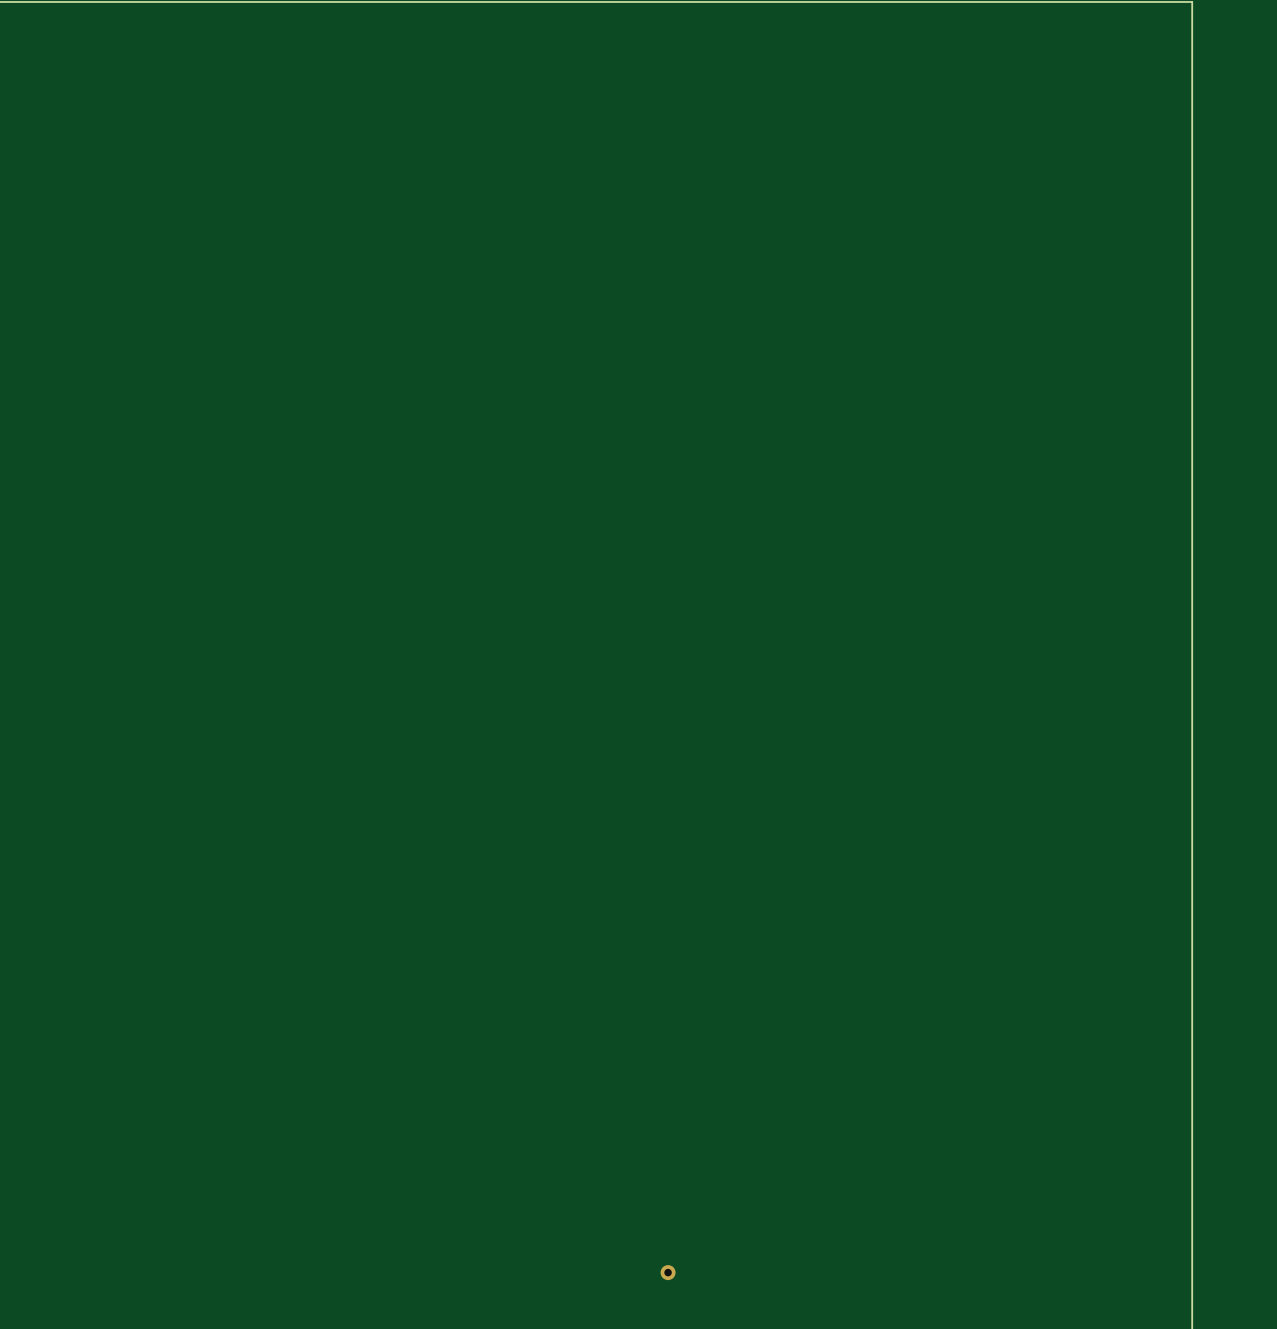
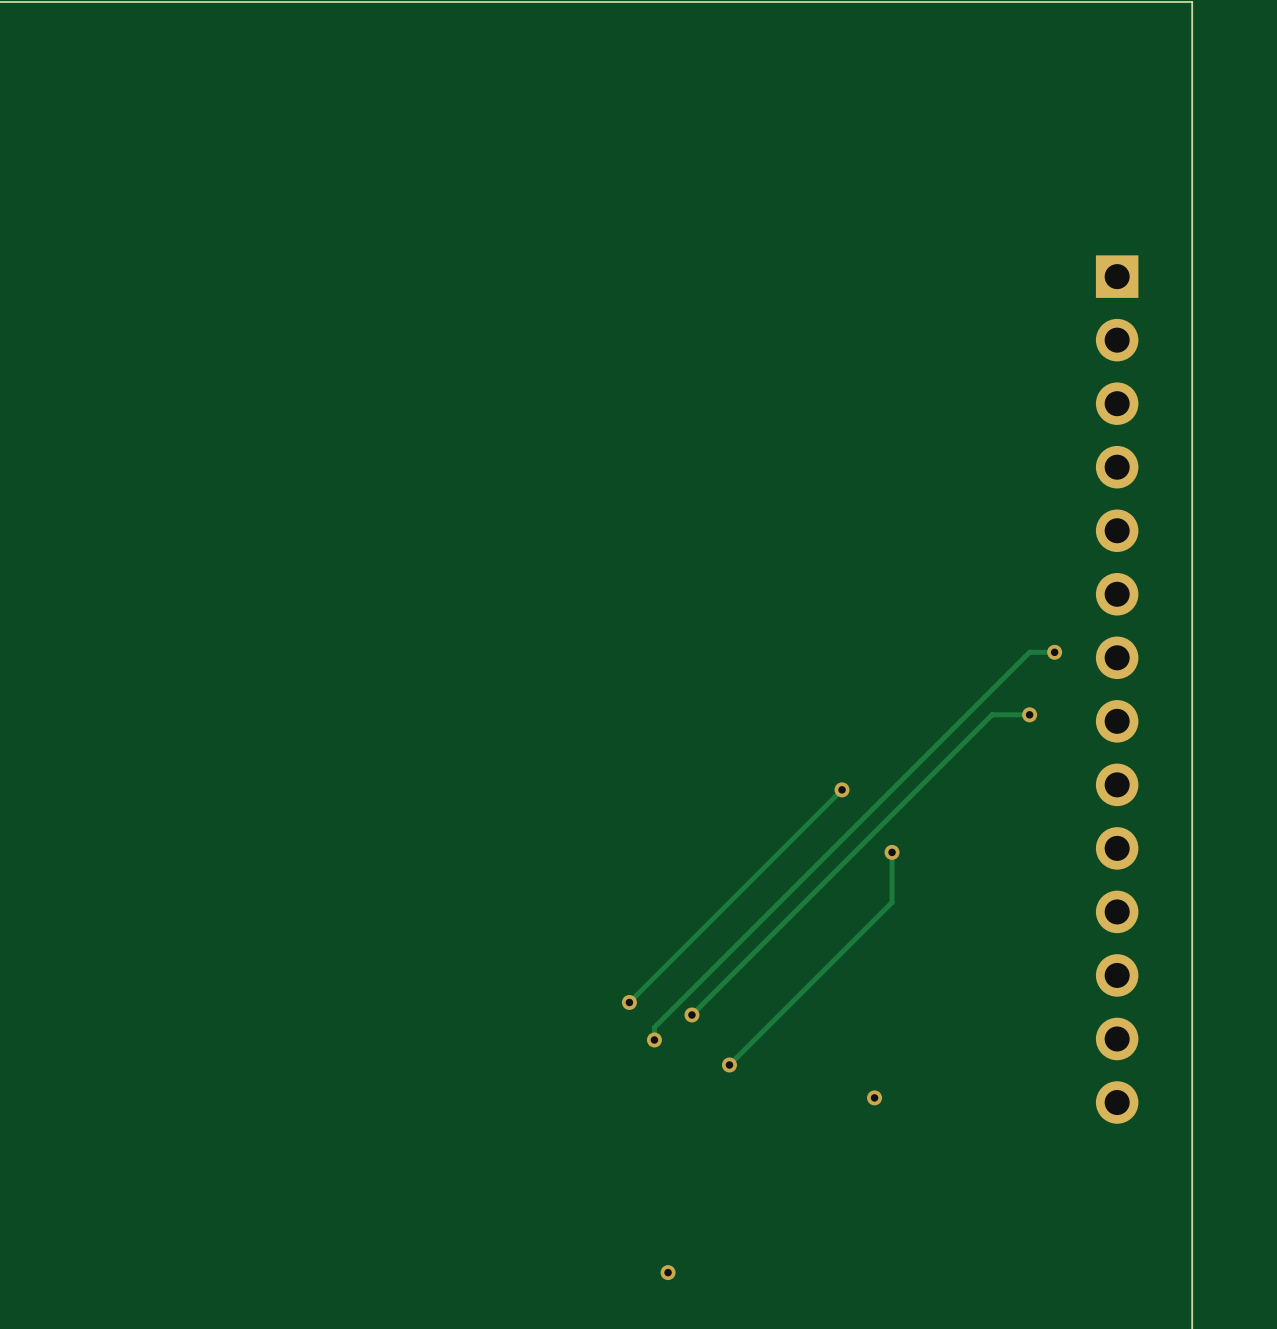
track: none -> (1054, 652) (1029, 652) (654, 1027) (654, 1039)
via: none -> (1054, 652)
part: none -> (1117, 689)
track: none -> (1029, 714) (992, 714) (691, 1014)
via: none -> (1029, 714)
track: none -> (842, 789) (629, 1002)
via: none -> (842, 789)
track: none -> (892, 852) (892, 902) (729, 1064)
via: none -> (892, 852)
via: none -> (629, 1002)
via: none -> (691, 1014)
via: none -> (654, 1039)
via: none -> (729, 1064)
via: none -> (874, 1097)

